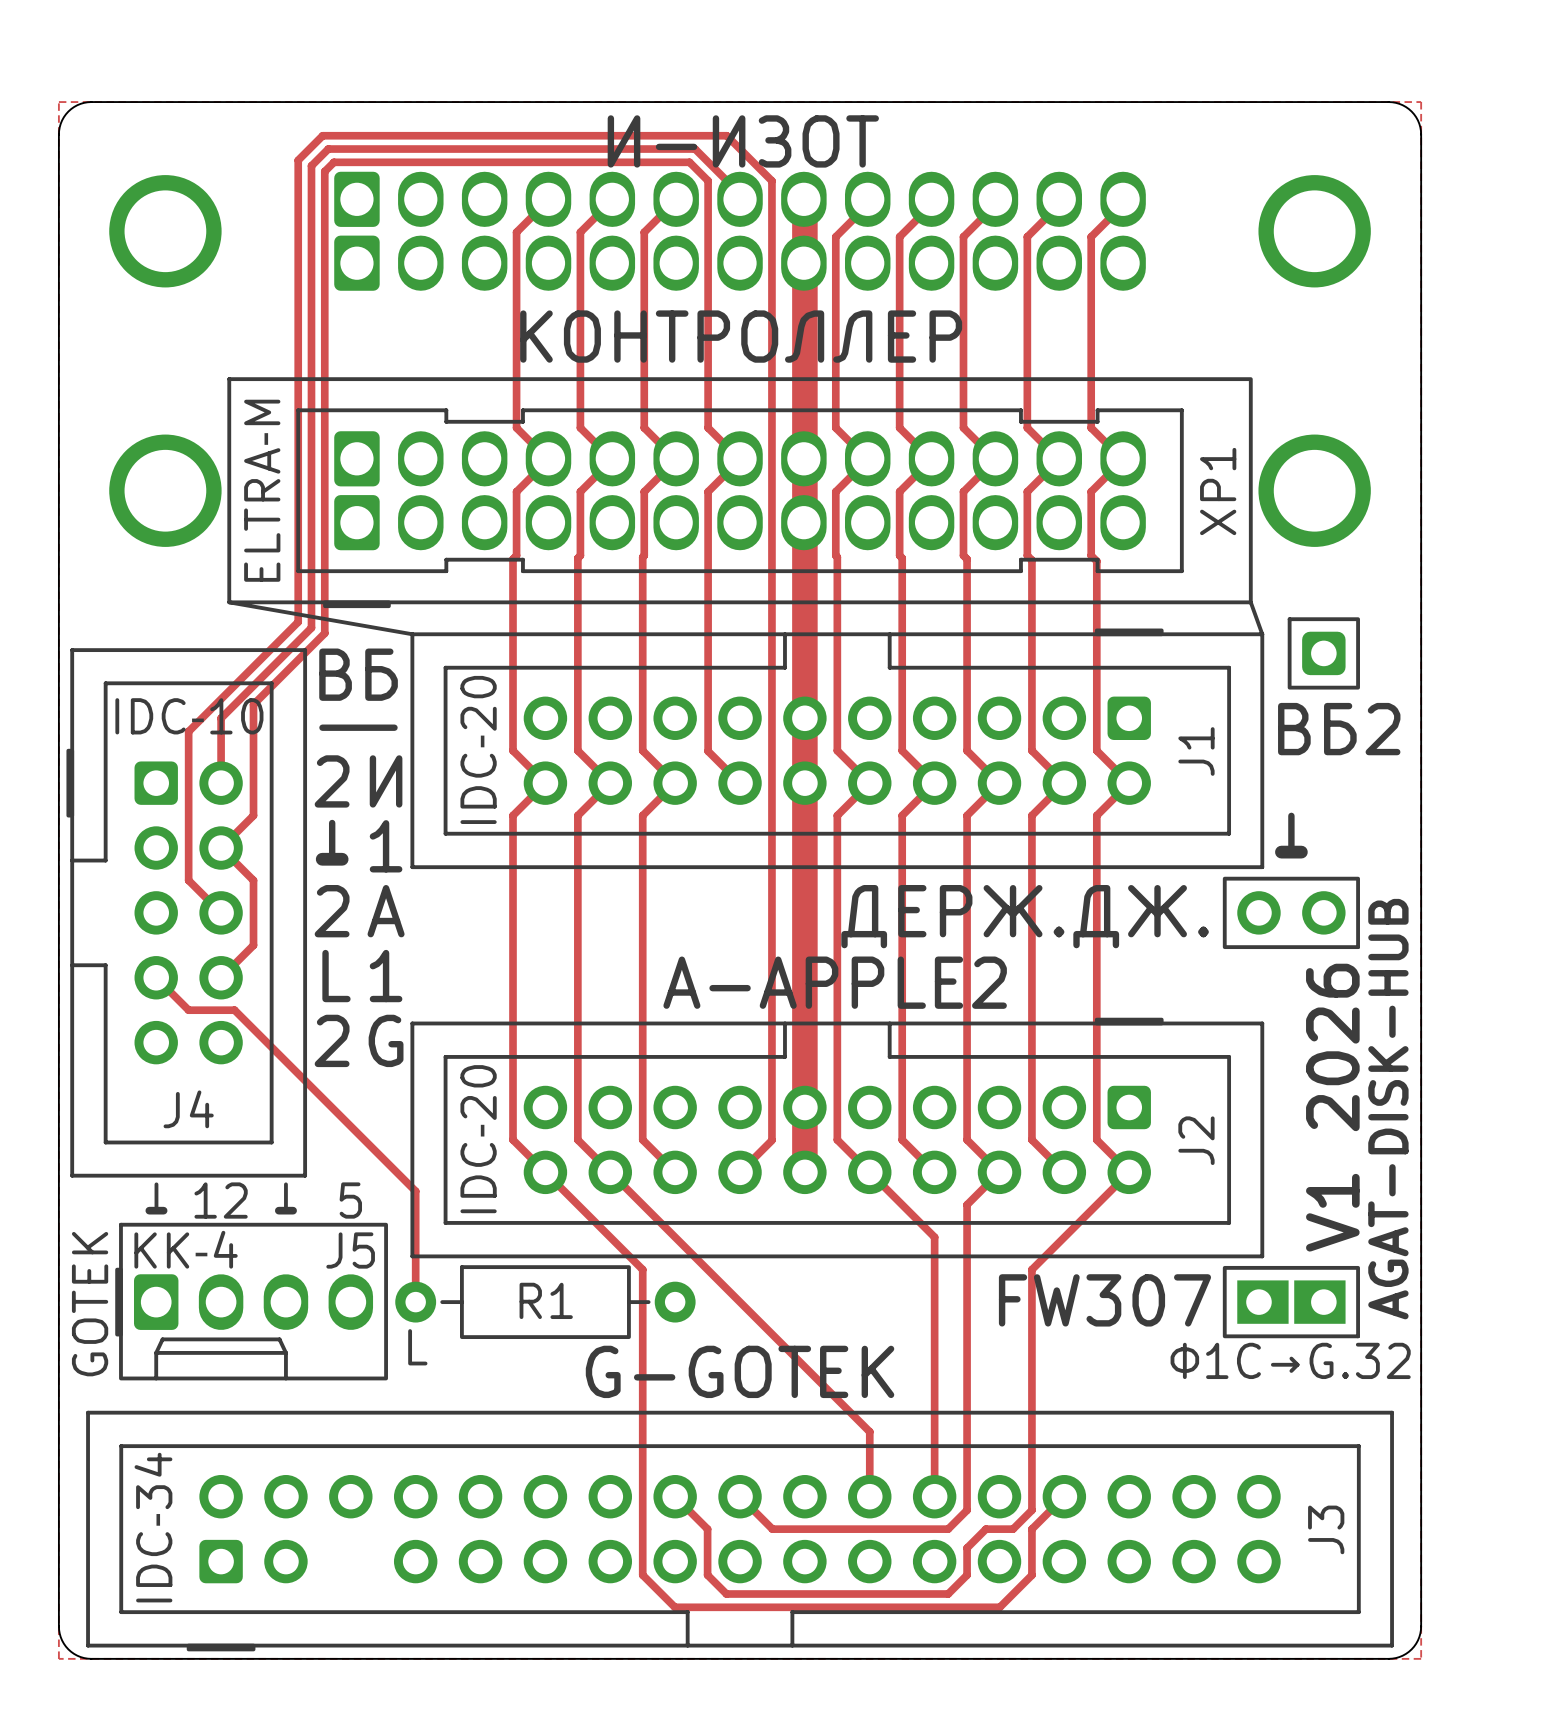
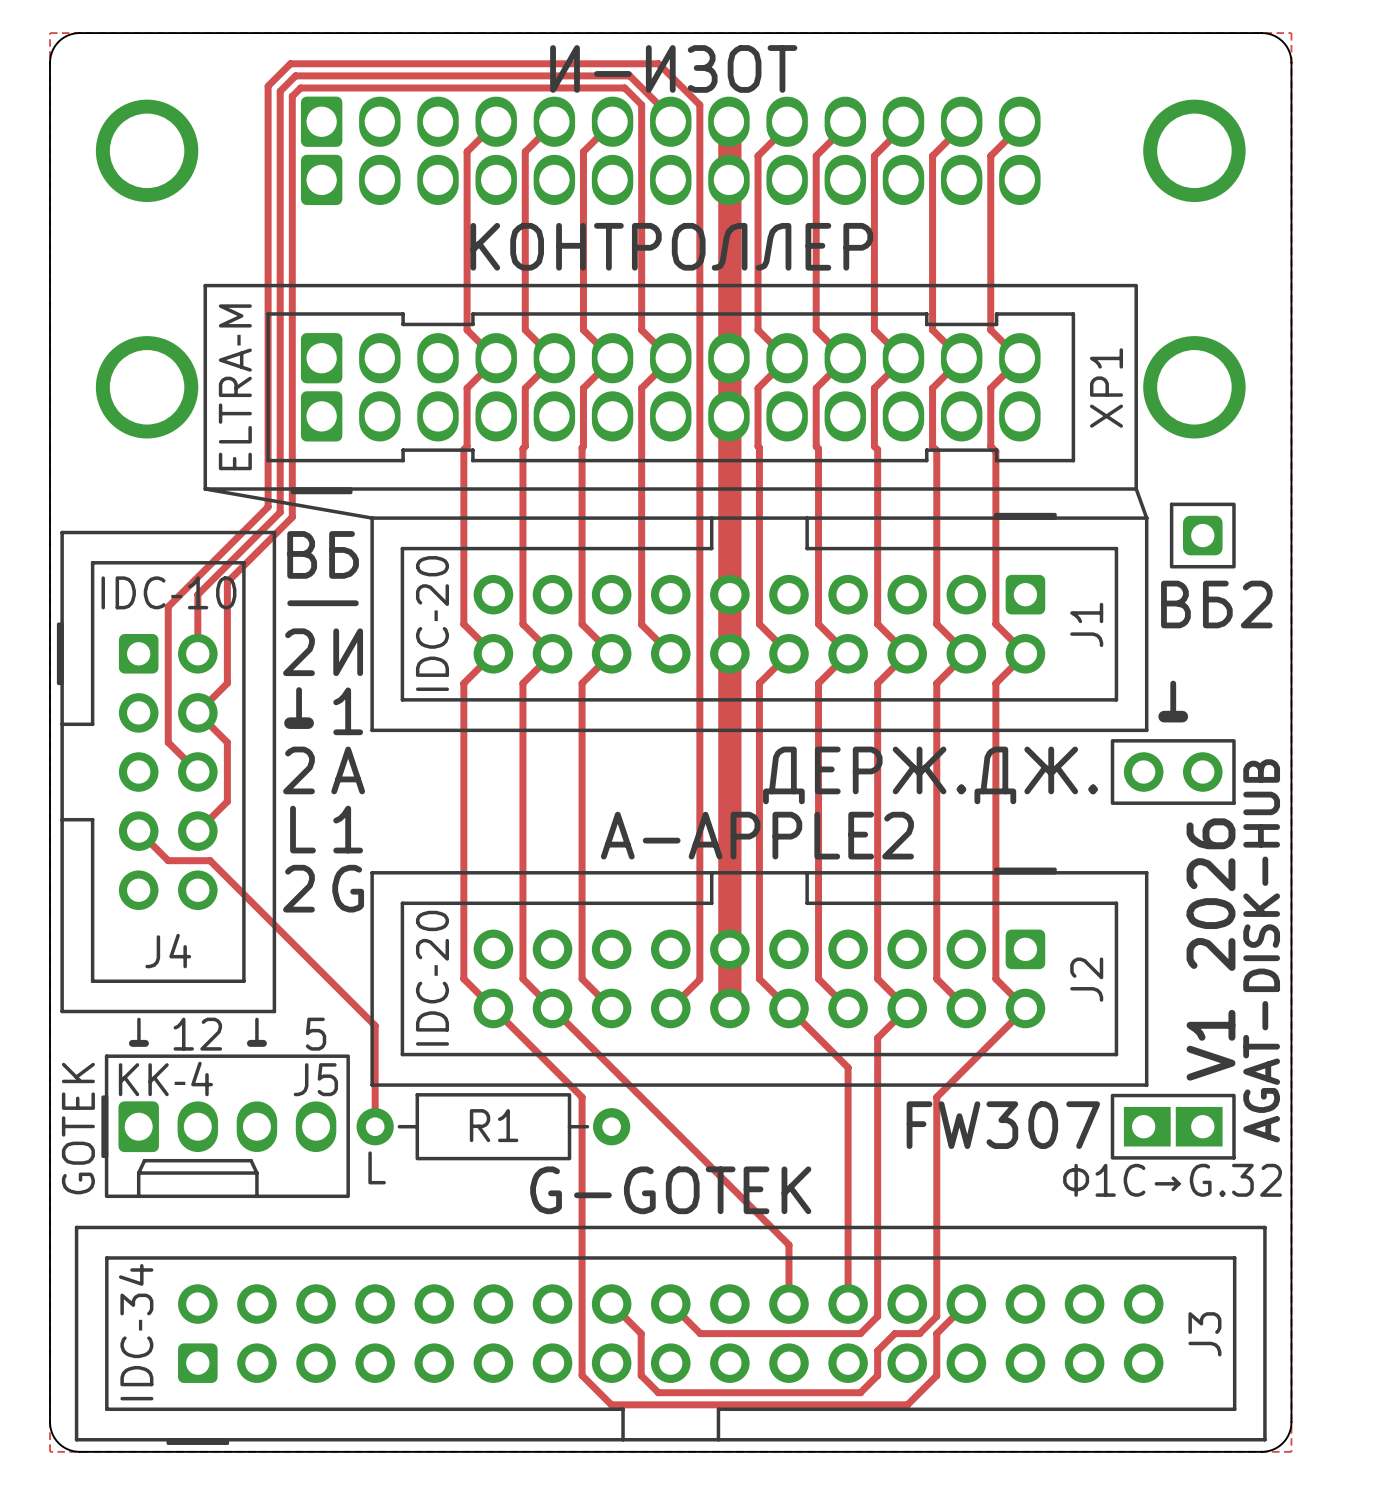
J3 footprint: [86, 1410, 1394, 1652] -> [74, 1225, 1267, 1445]

